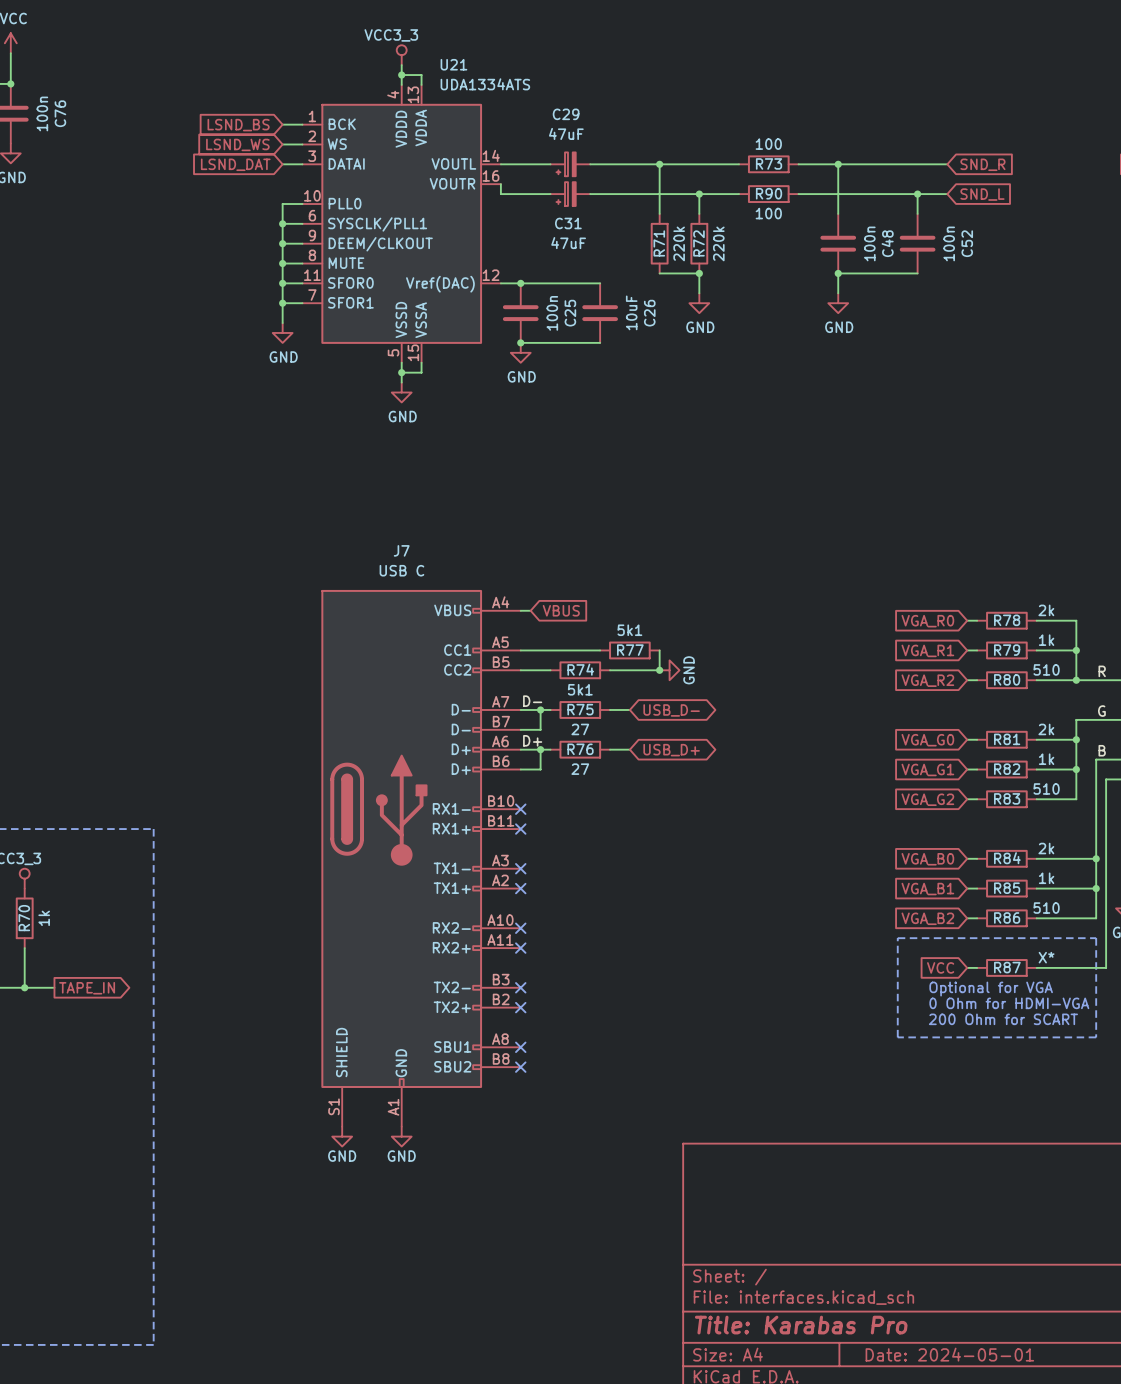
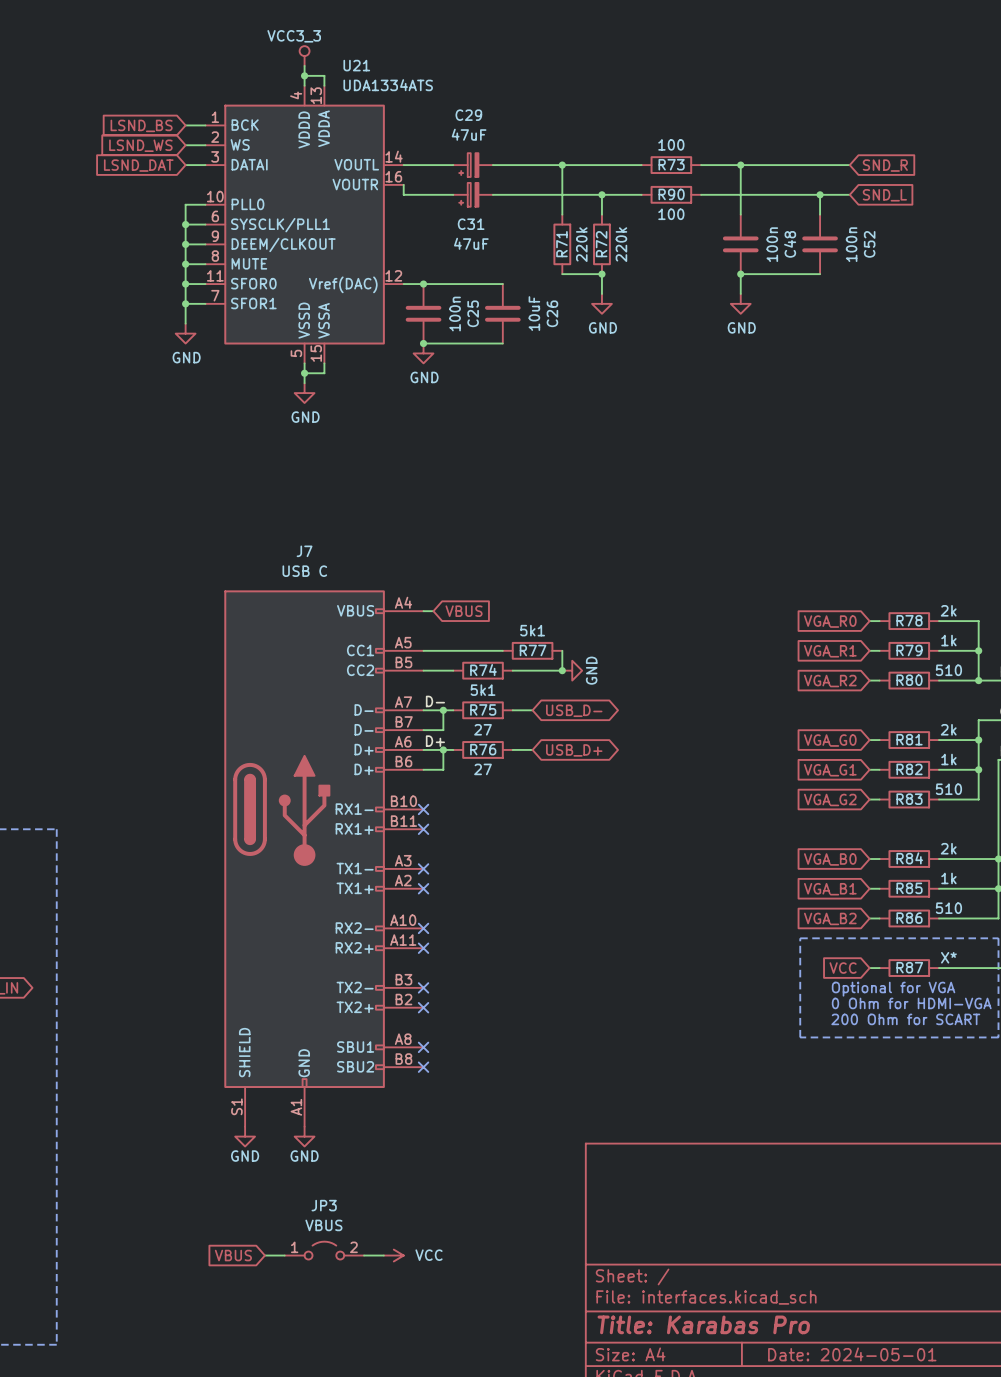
JP3: none -> VBUS (324, 1250)
global label: none -> VBUS (233, 1255)
wire: none -> (264, 1255) (284, 1255)
wire: none -> (364, 1255) (383, 1255)
power symbol: none -> VCC (393, 1255)

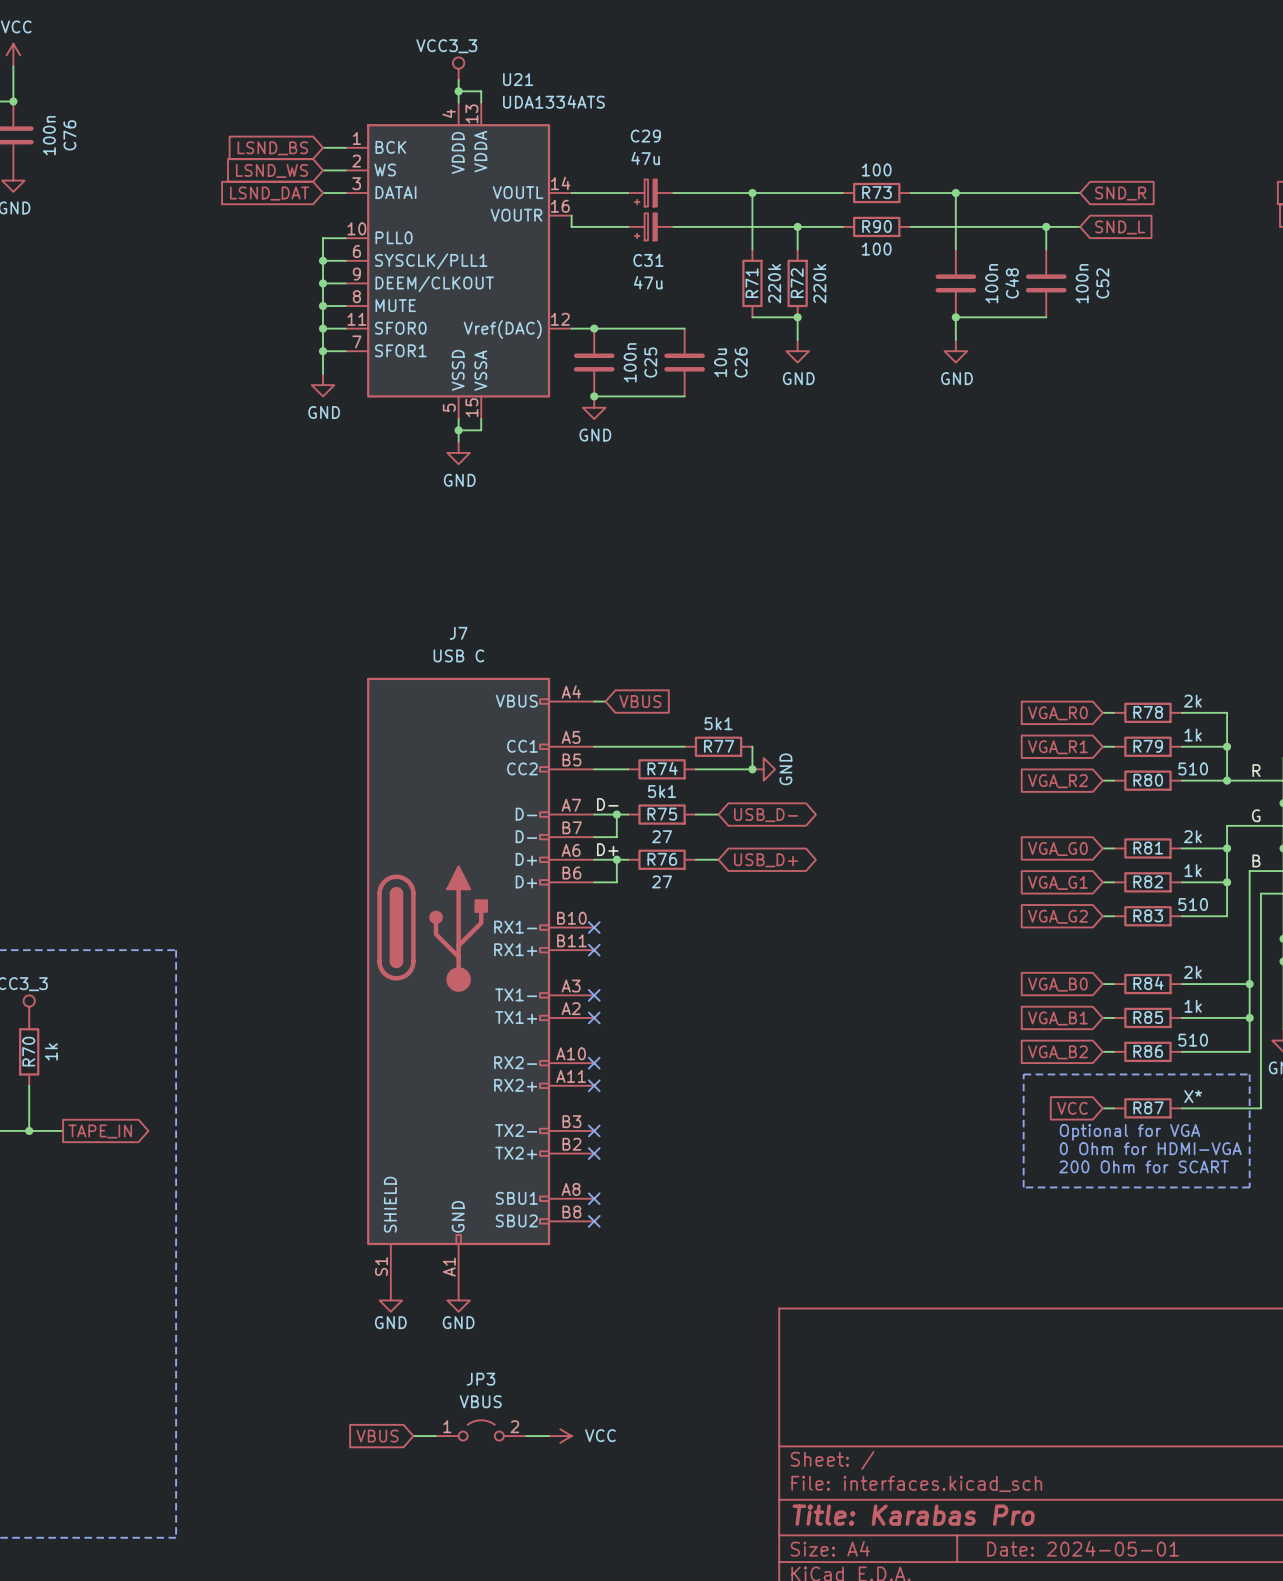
C29 value: 47uF (469, 134) -> 47u (645, 158)
C31 value: 47uF (471, 243) -> 47u (648, 282)
C26 value: 10uF (534, 313) -> 10u (720, 362)

